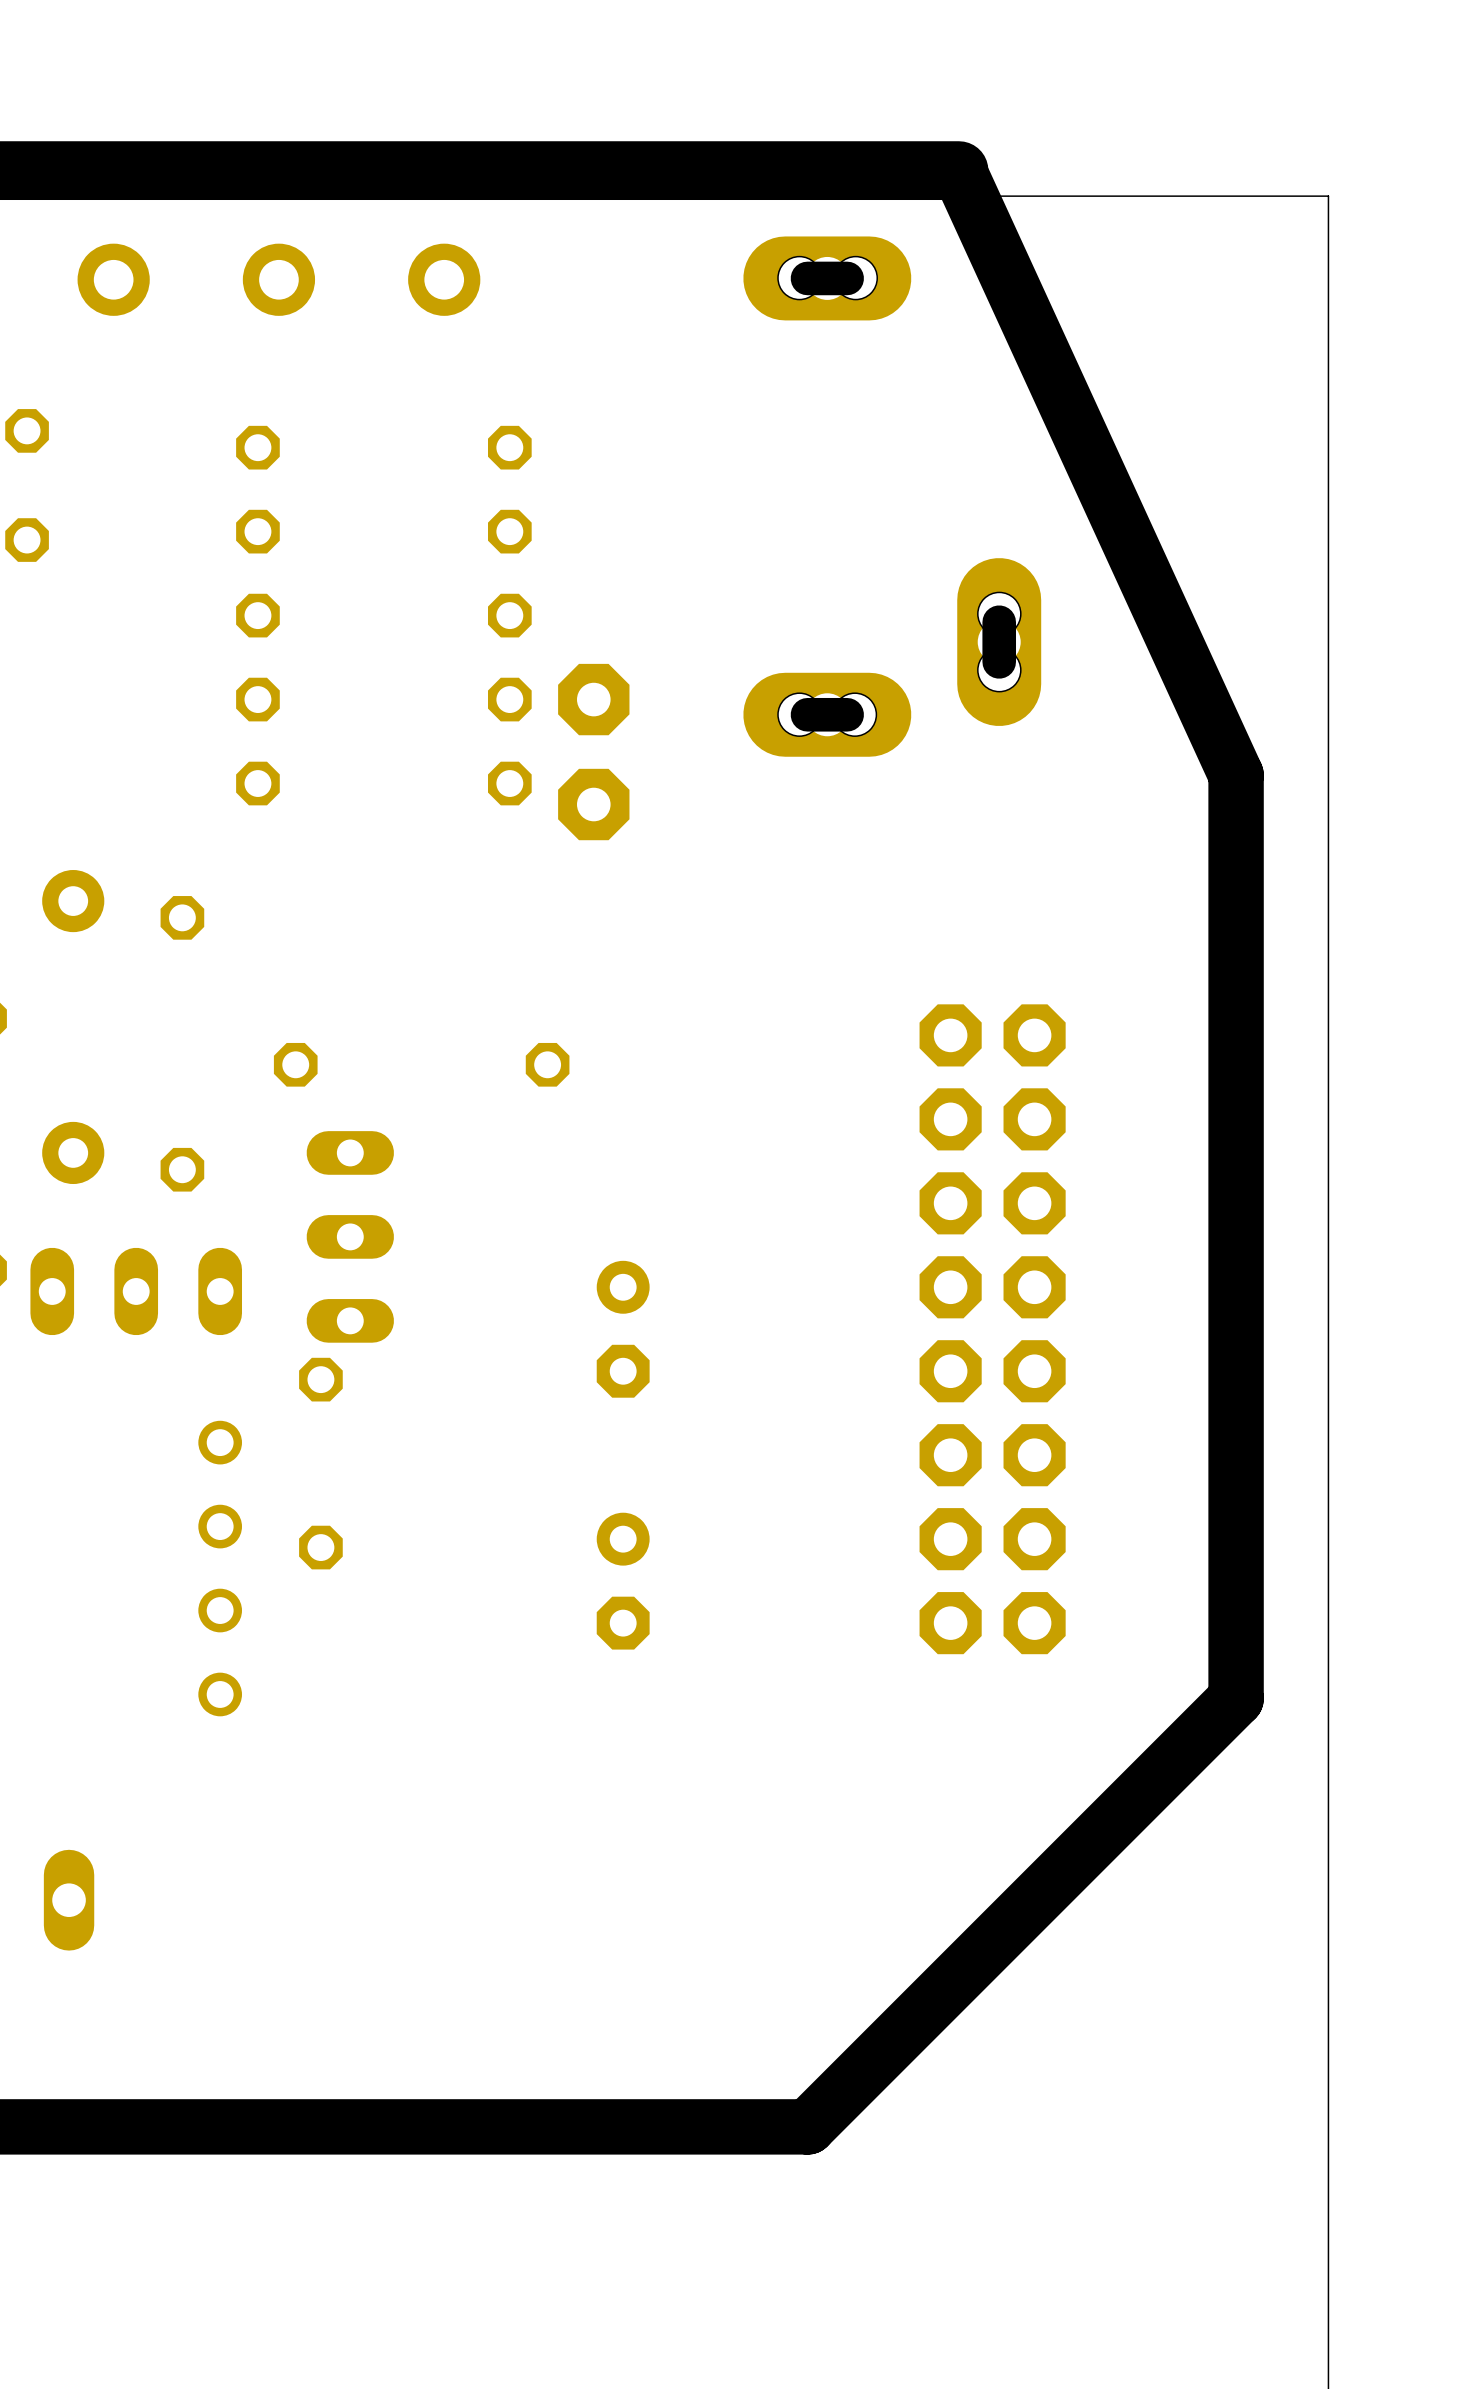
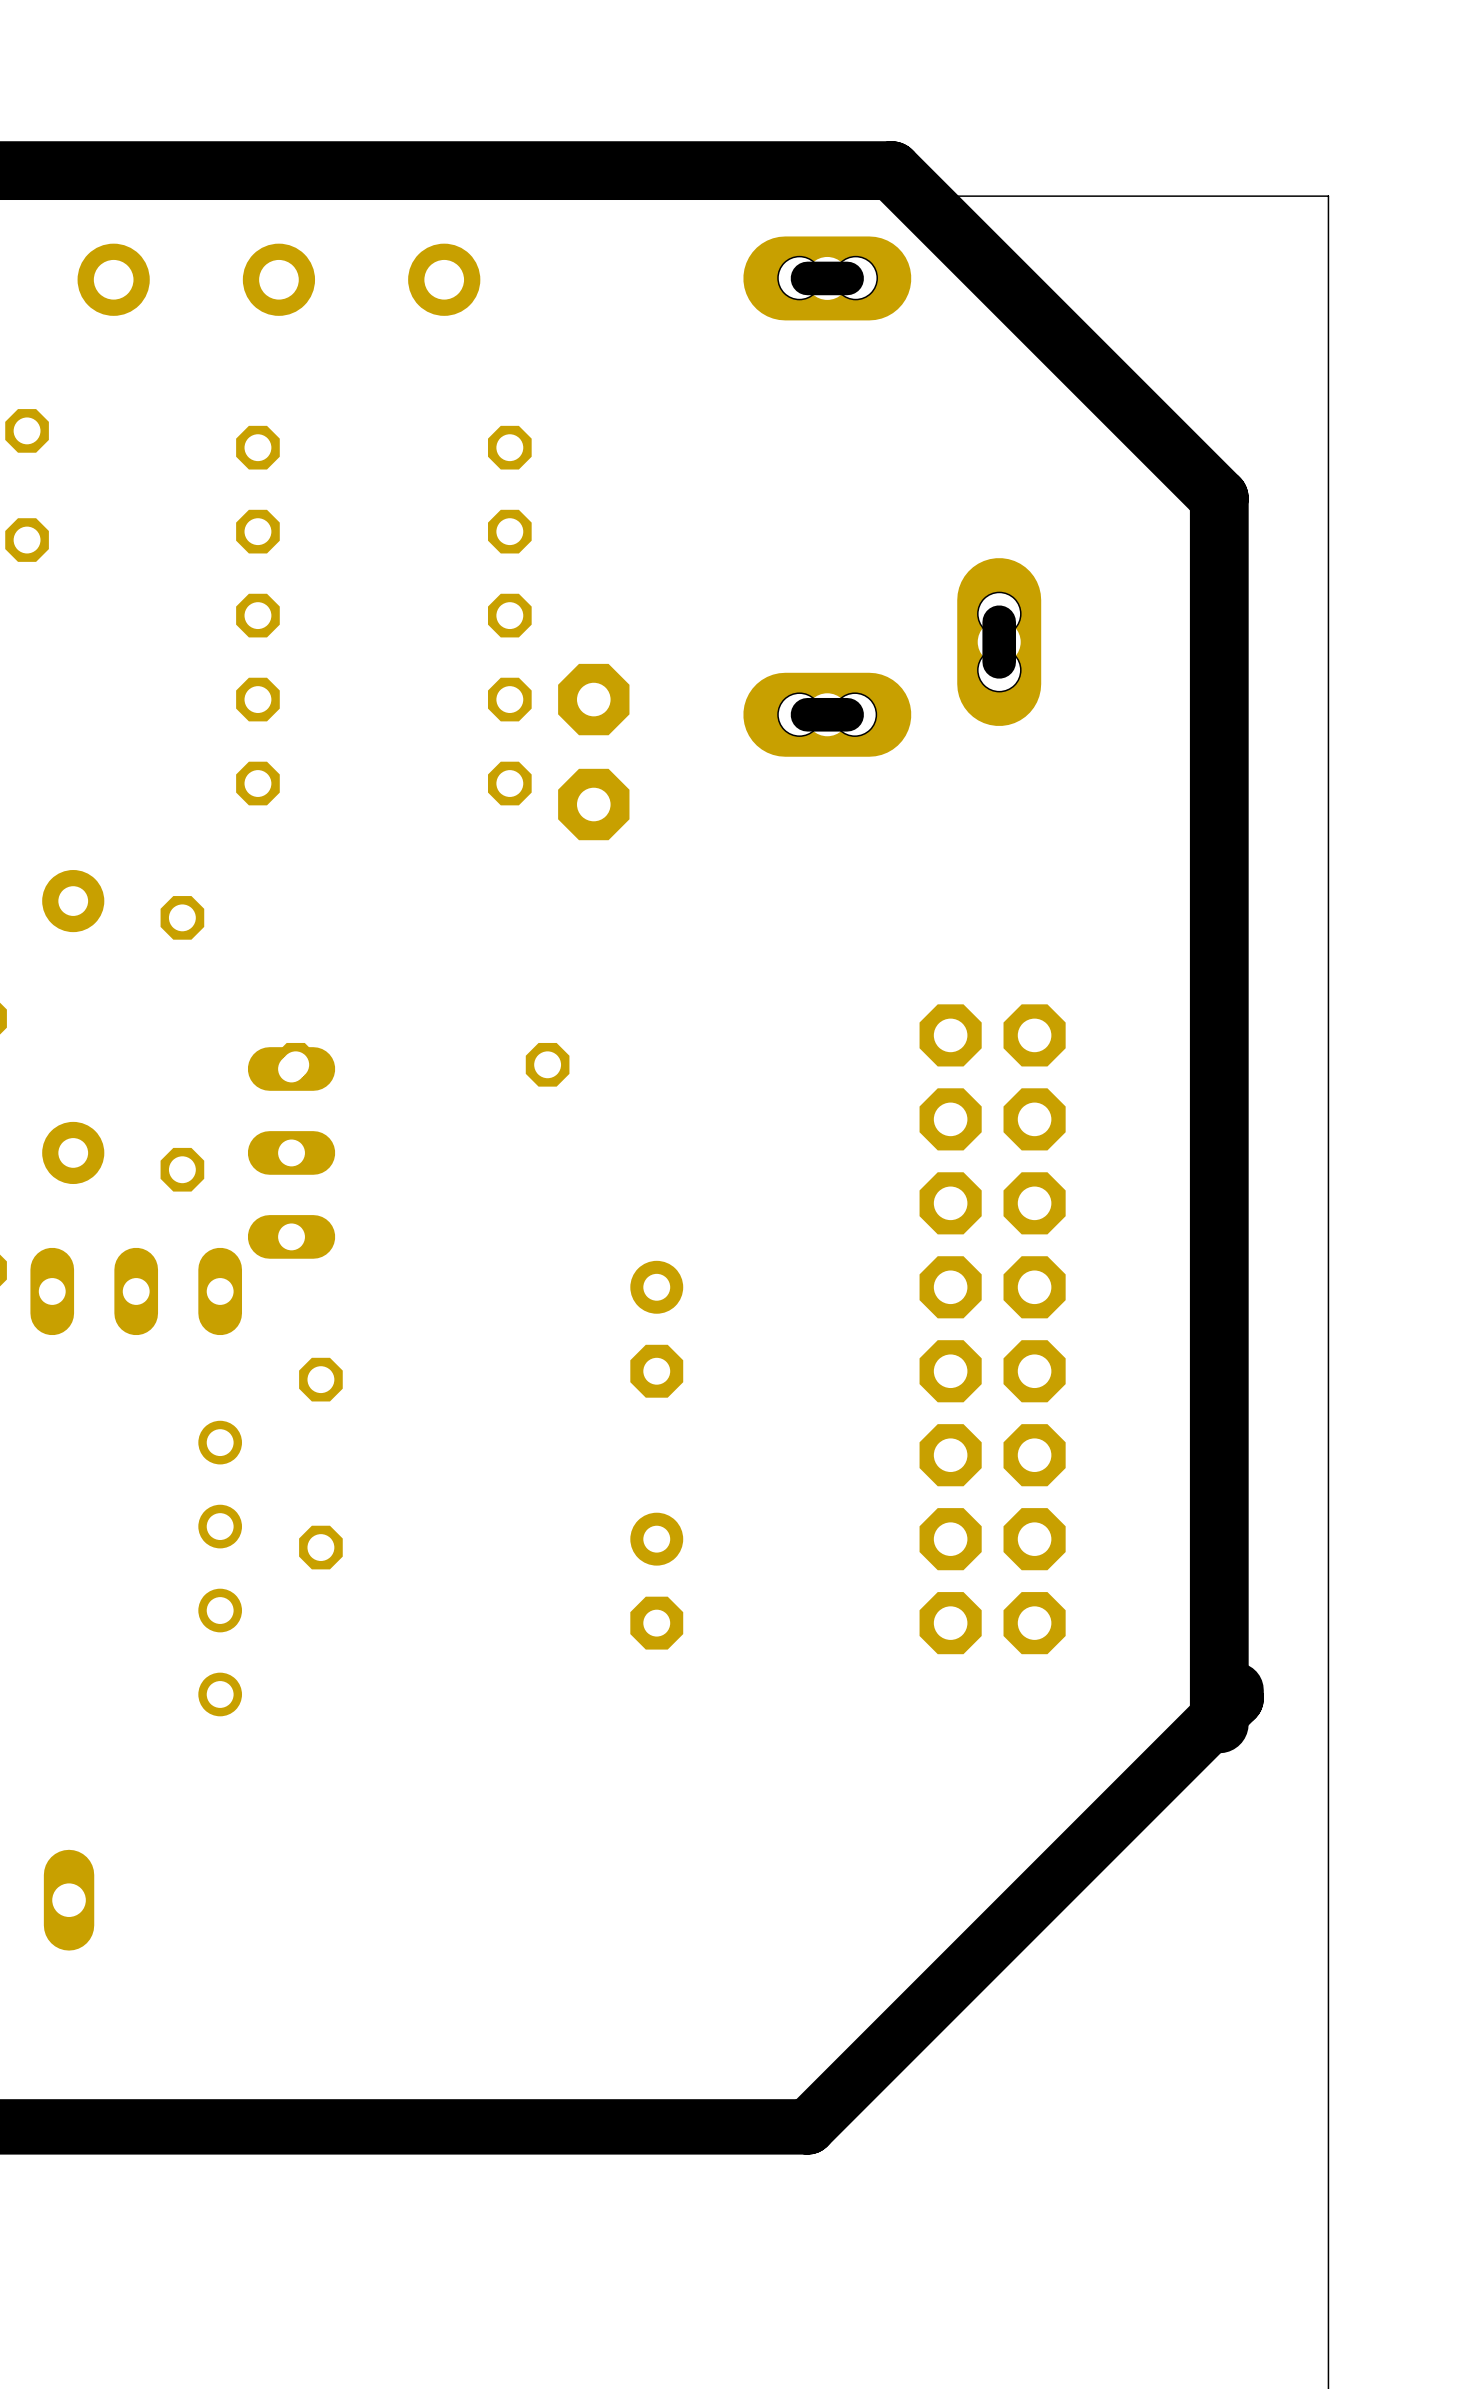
board edge: (891, 170) (959, 170) (1236, 775) (1236, 1690) -> (891, 170) (1219, 498) (1219, 1723)
part position: (350, 1236) -> (291, 1152)
part position: (623, 1329) -> (656, 1329)
part position: (623, 1581) -> (656, 1581)

